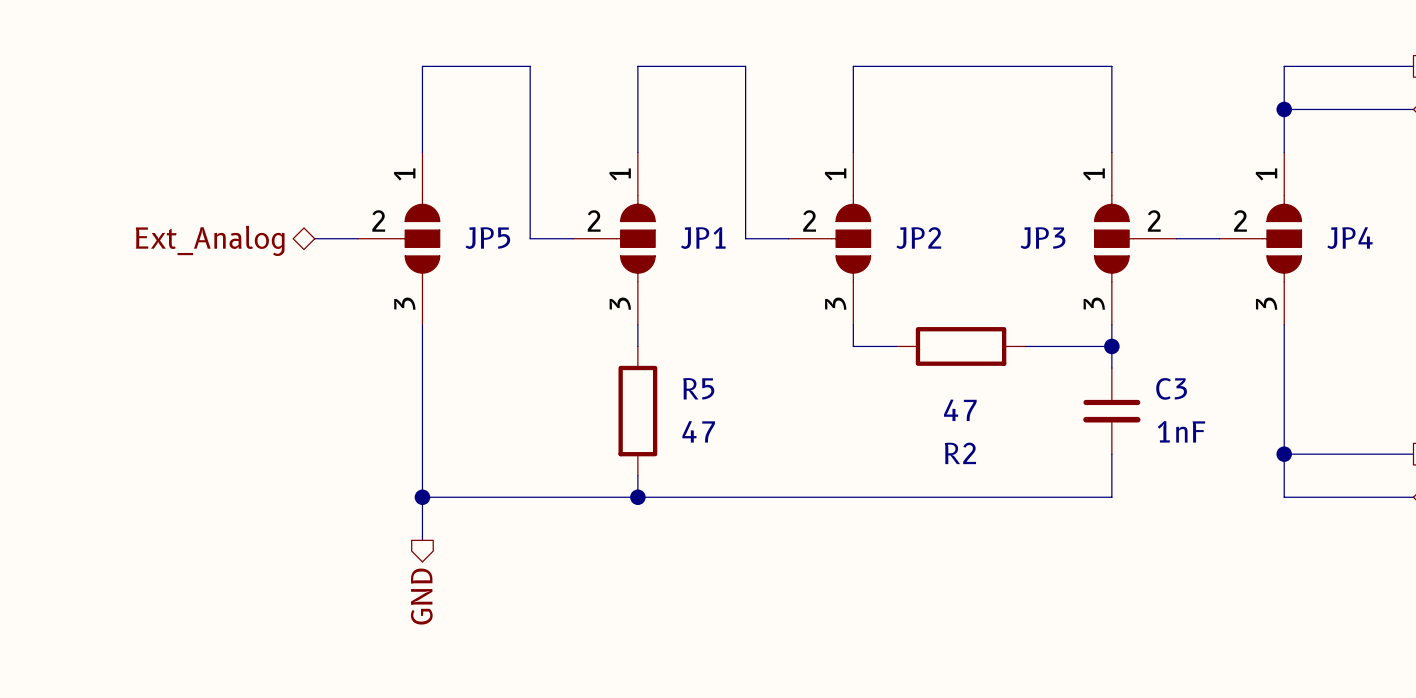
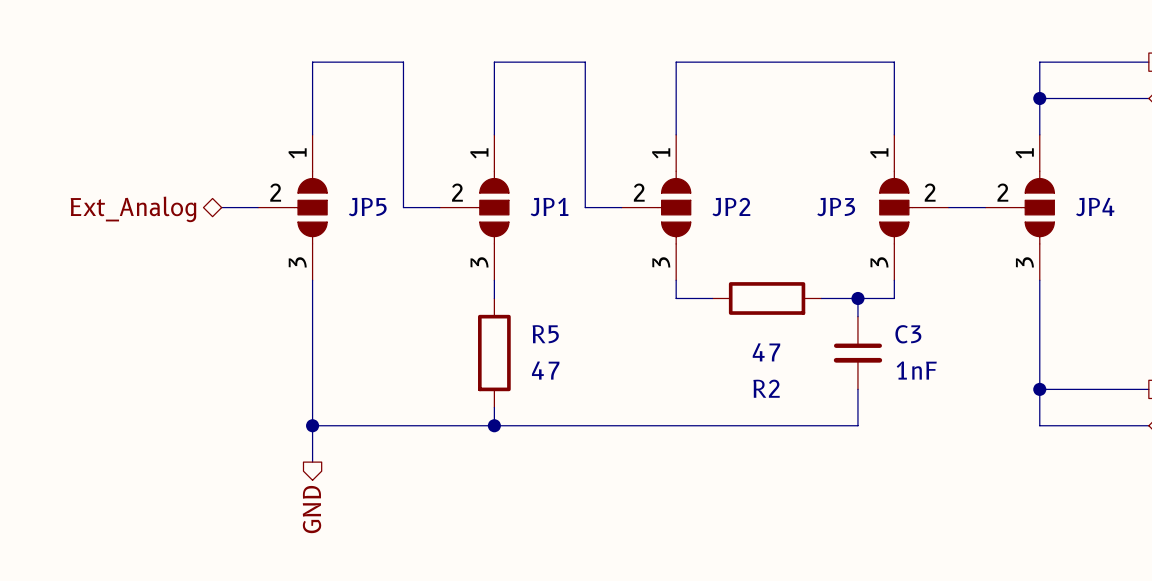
wire: (1111, 346) (1111, 367) -> (857, 298) (857, 316)
junction position: (1111, 346) -> (857, 298)
C3 position: (1111, 411) -> (857, 353)
wire: (1111, 454) (1111, 497) (1068, 497) -> (857, 389) (857, 425)

